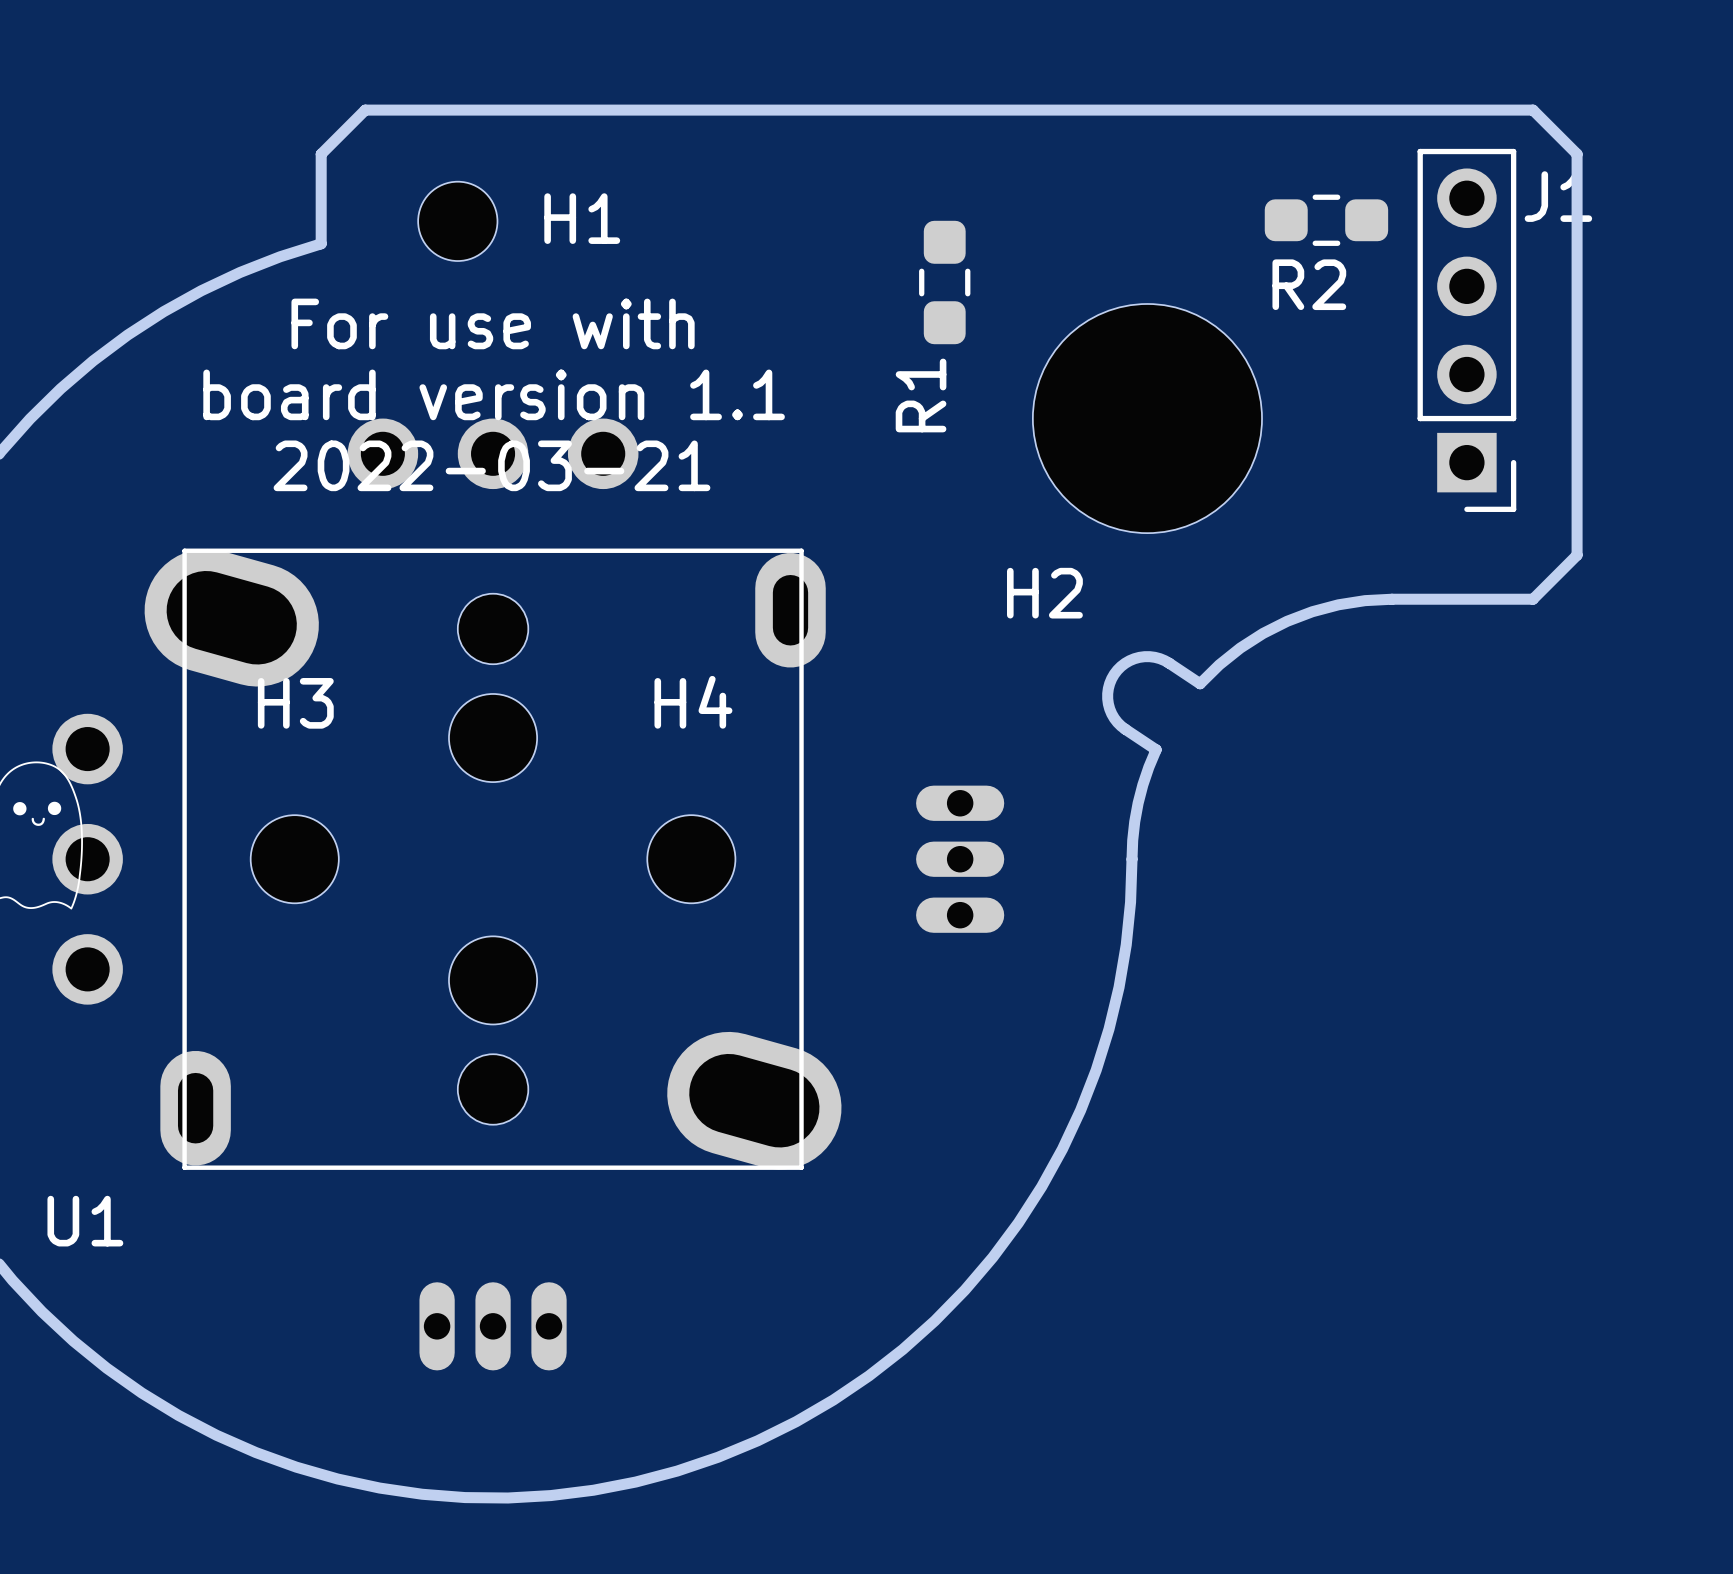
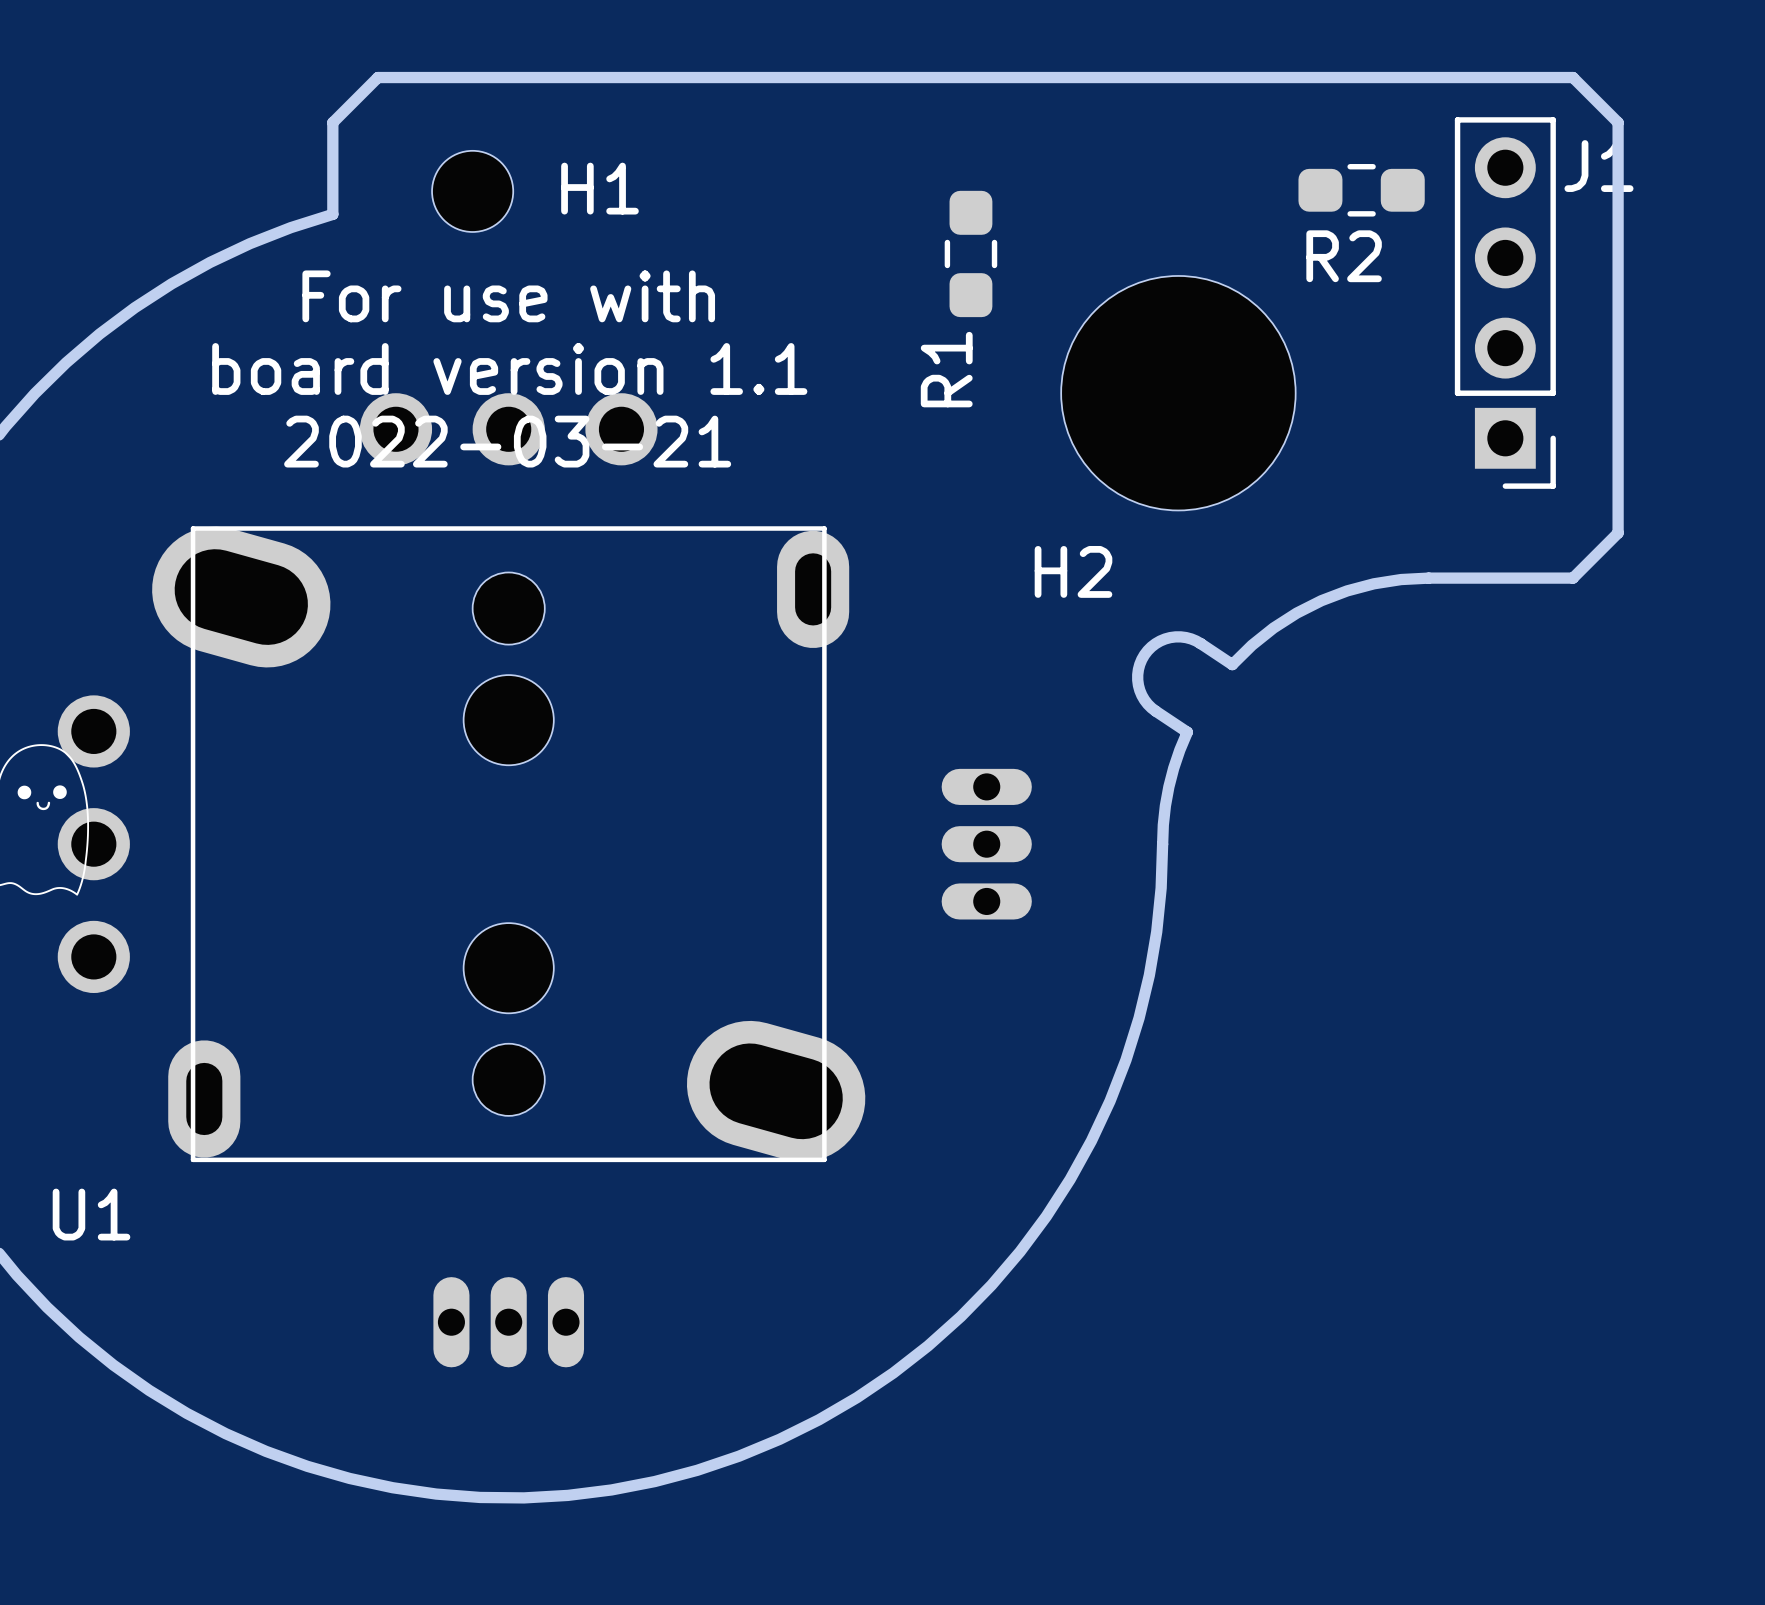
H3: (294, 859) -> none
H4: (691, 859) -> none

